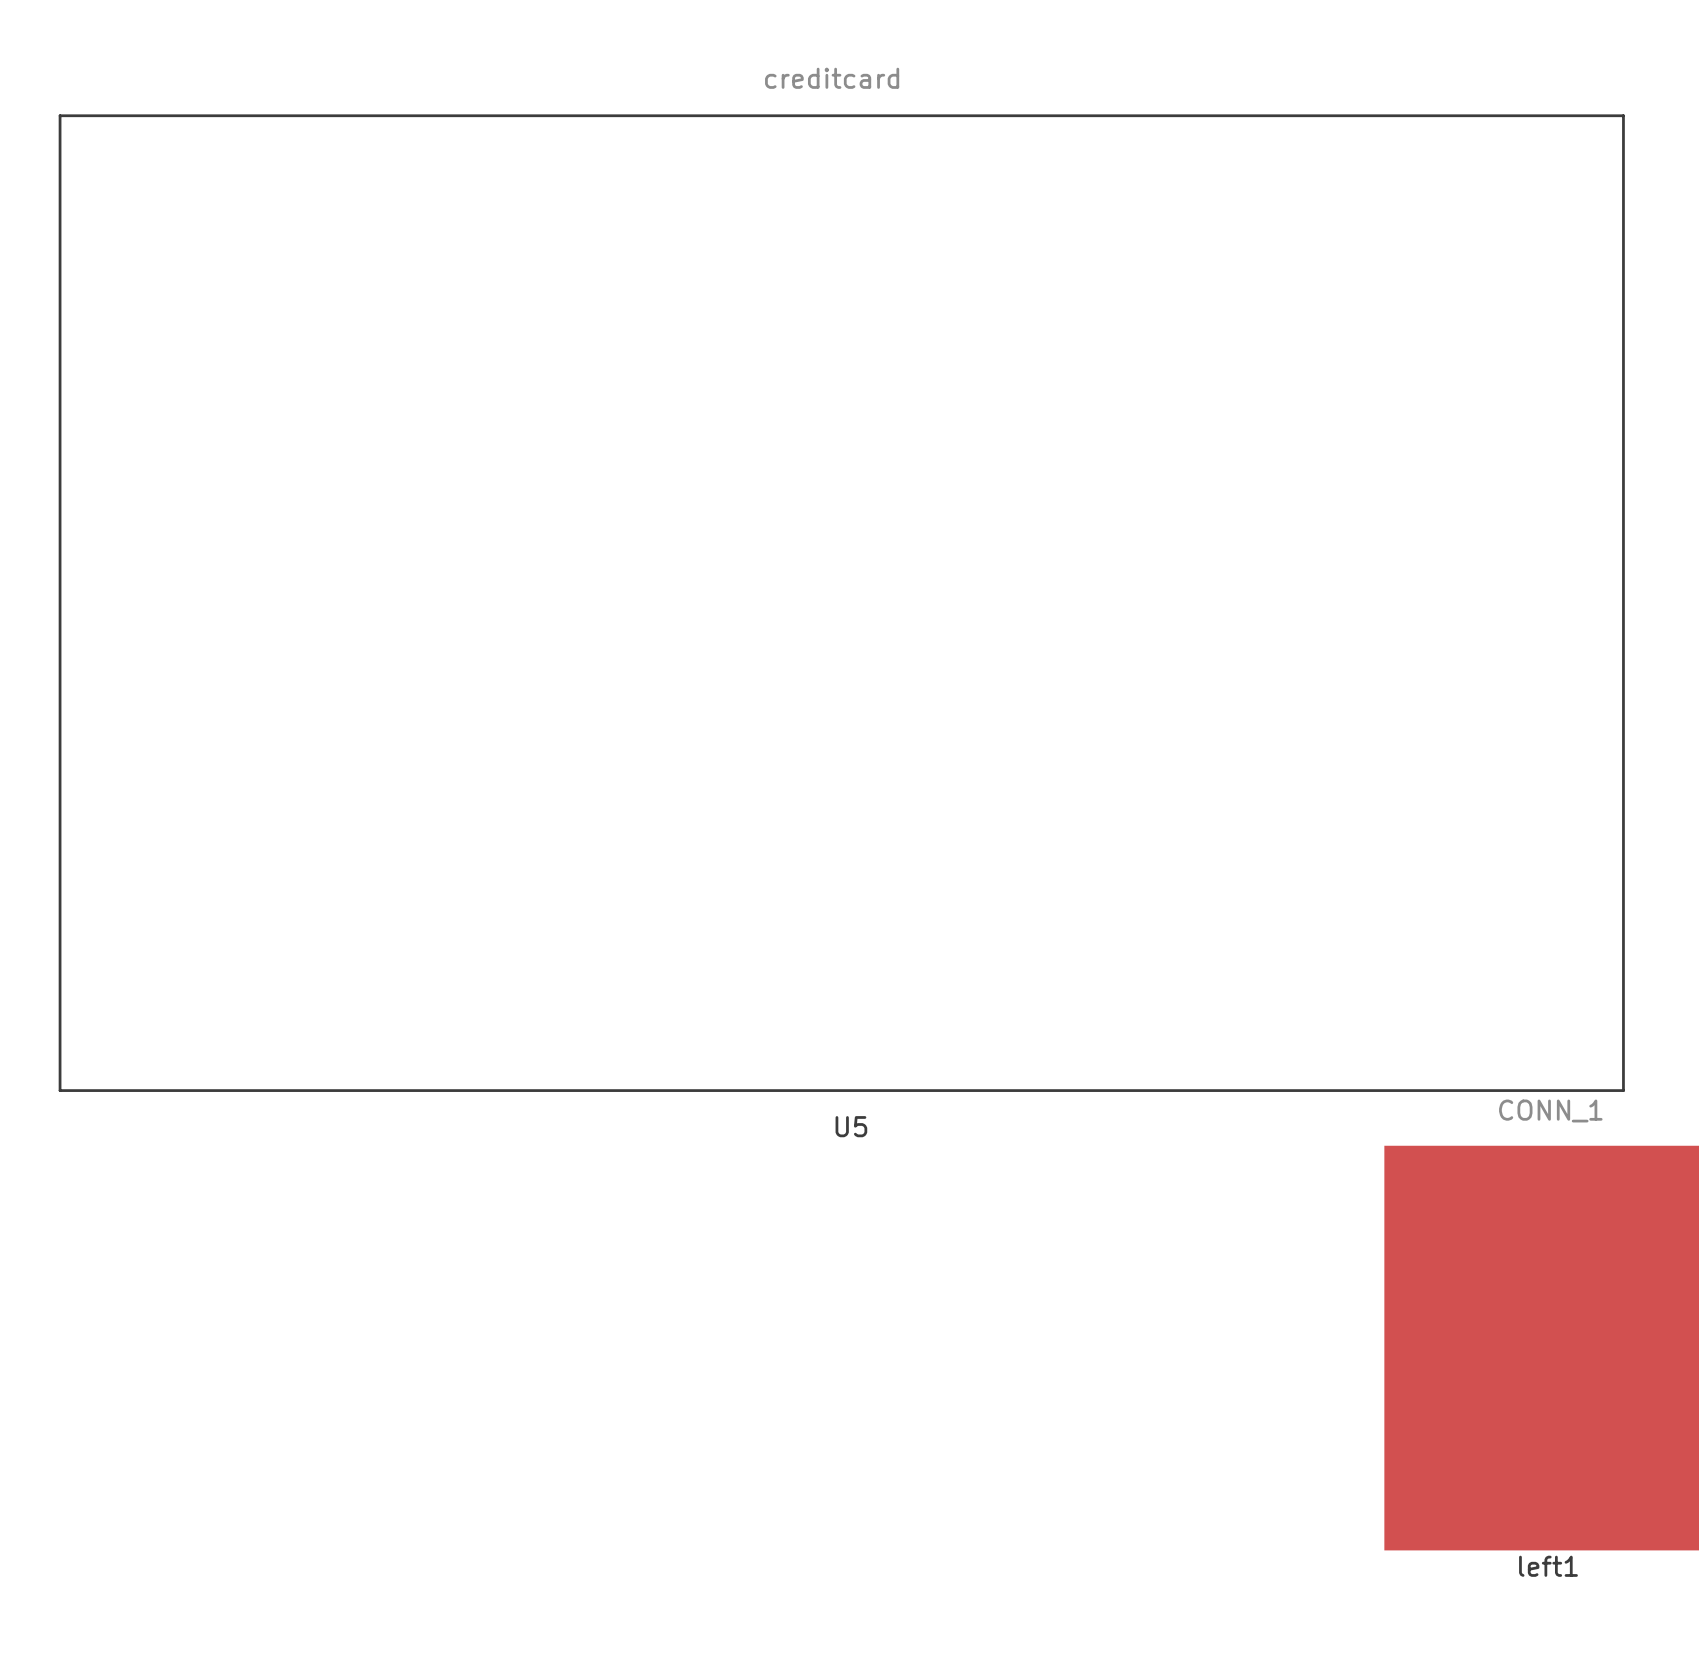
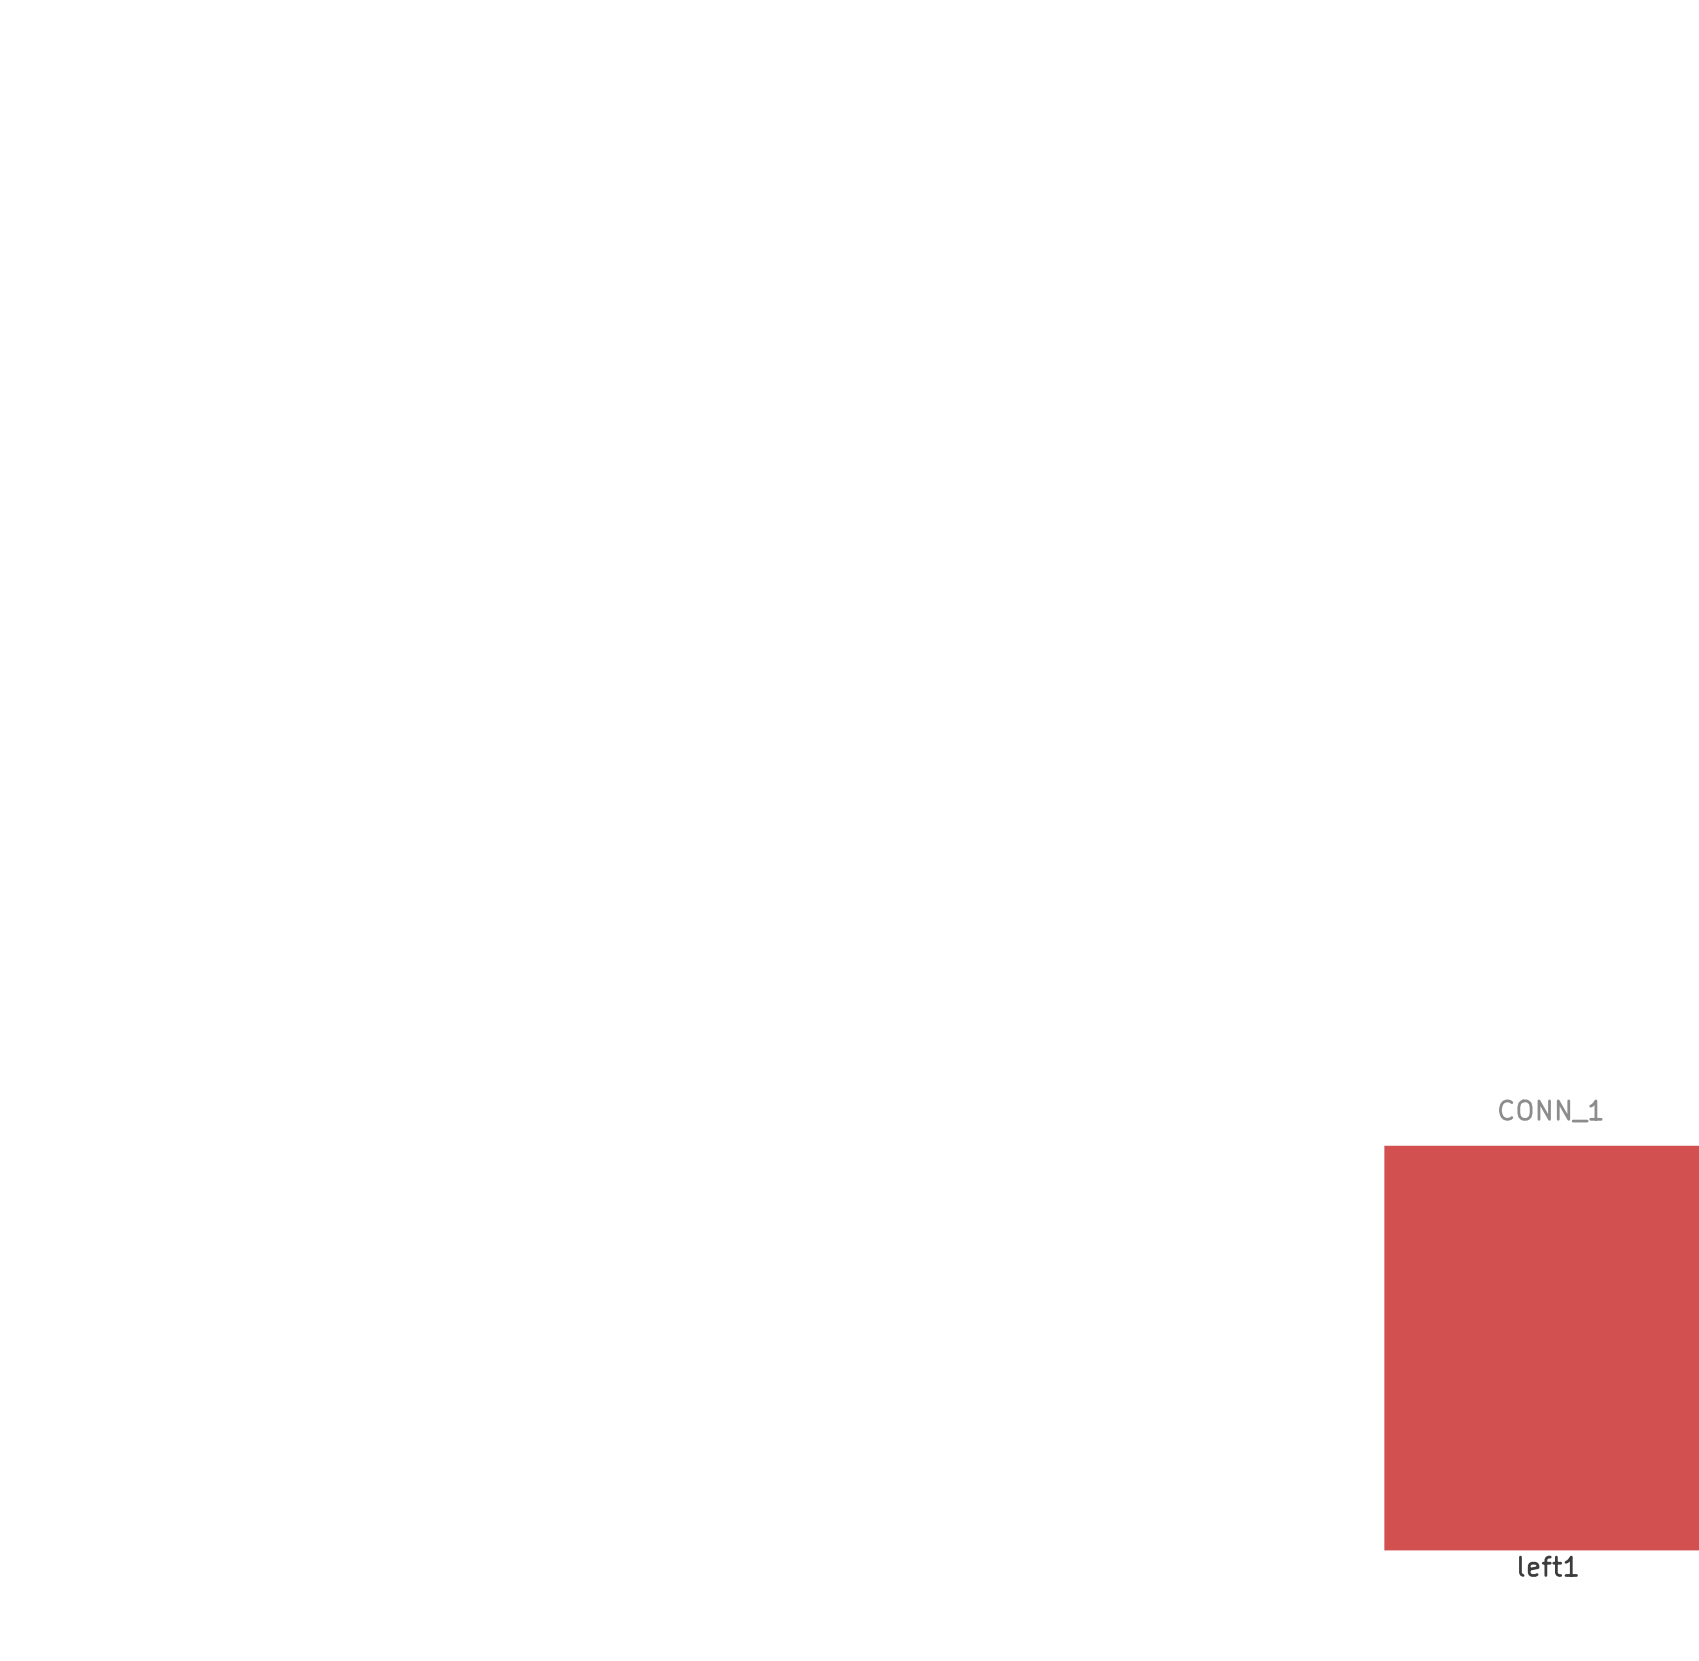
U5: creditcard (841, 603) -> none

